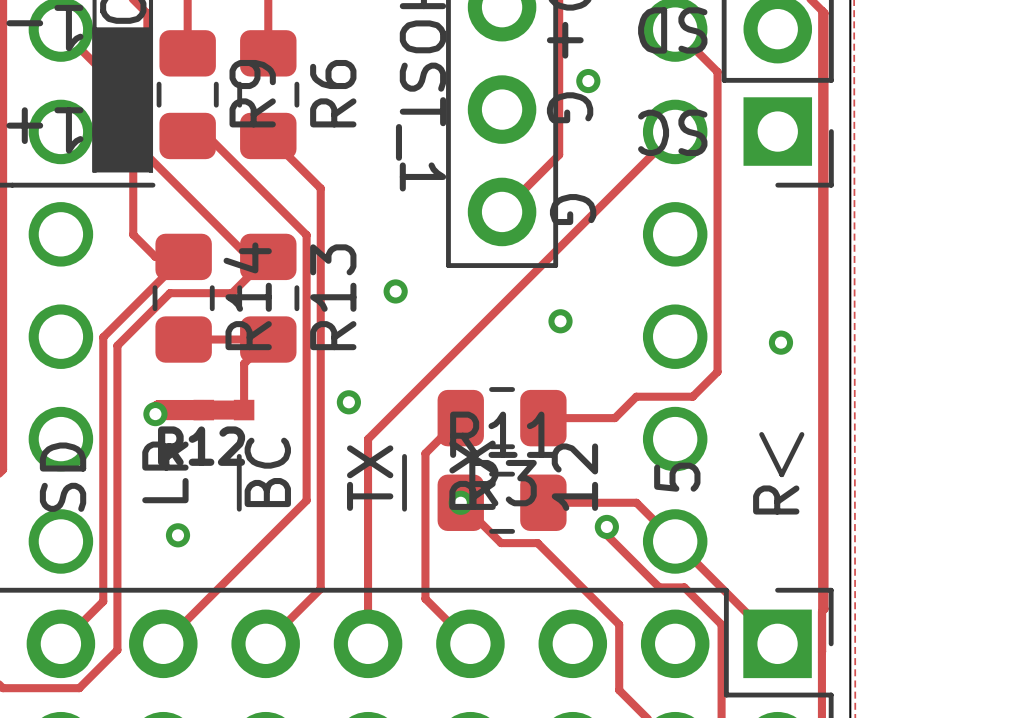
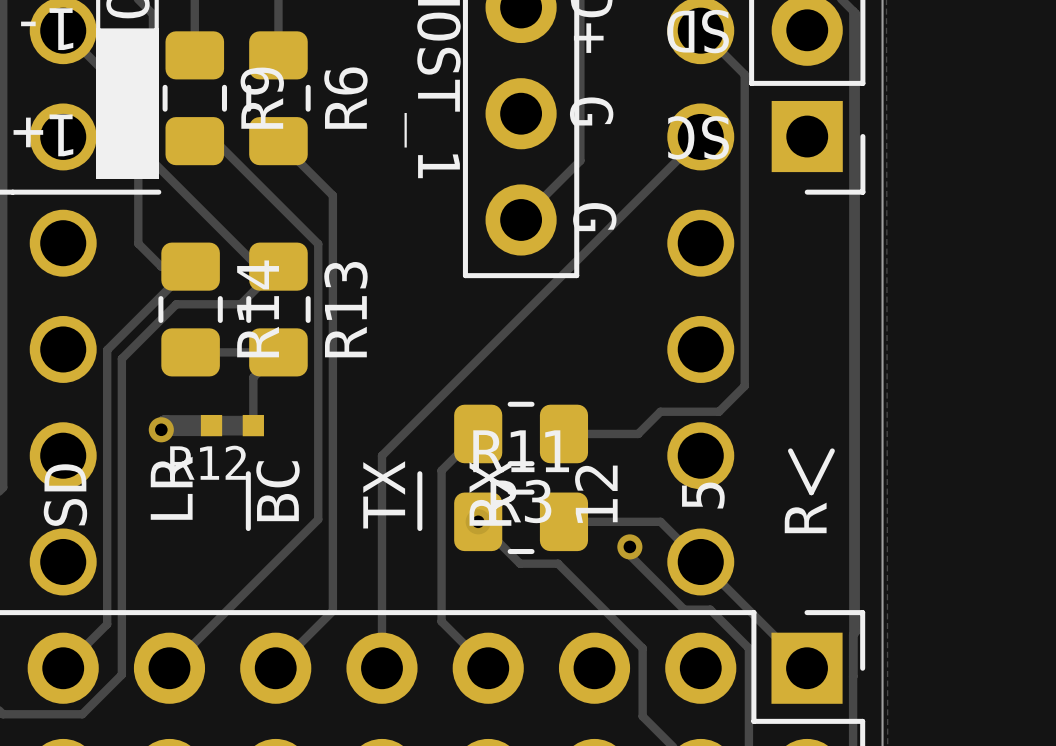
via: (588, 81) -> none
via: (395, 291) -> none
via: (560, 321) -> none
via: (780, 342) -> none
via: (348, 402) -> none
via: (178, 535) -> none

